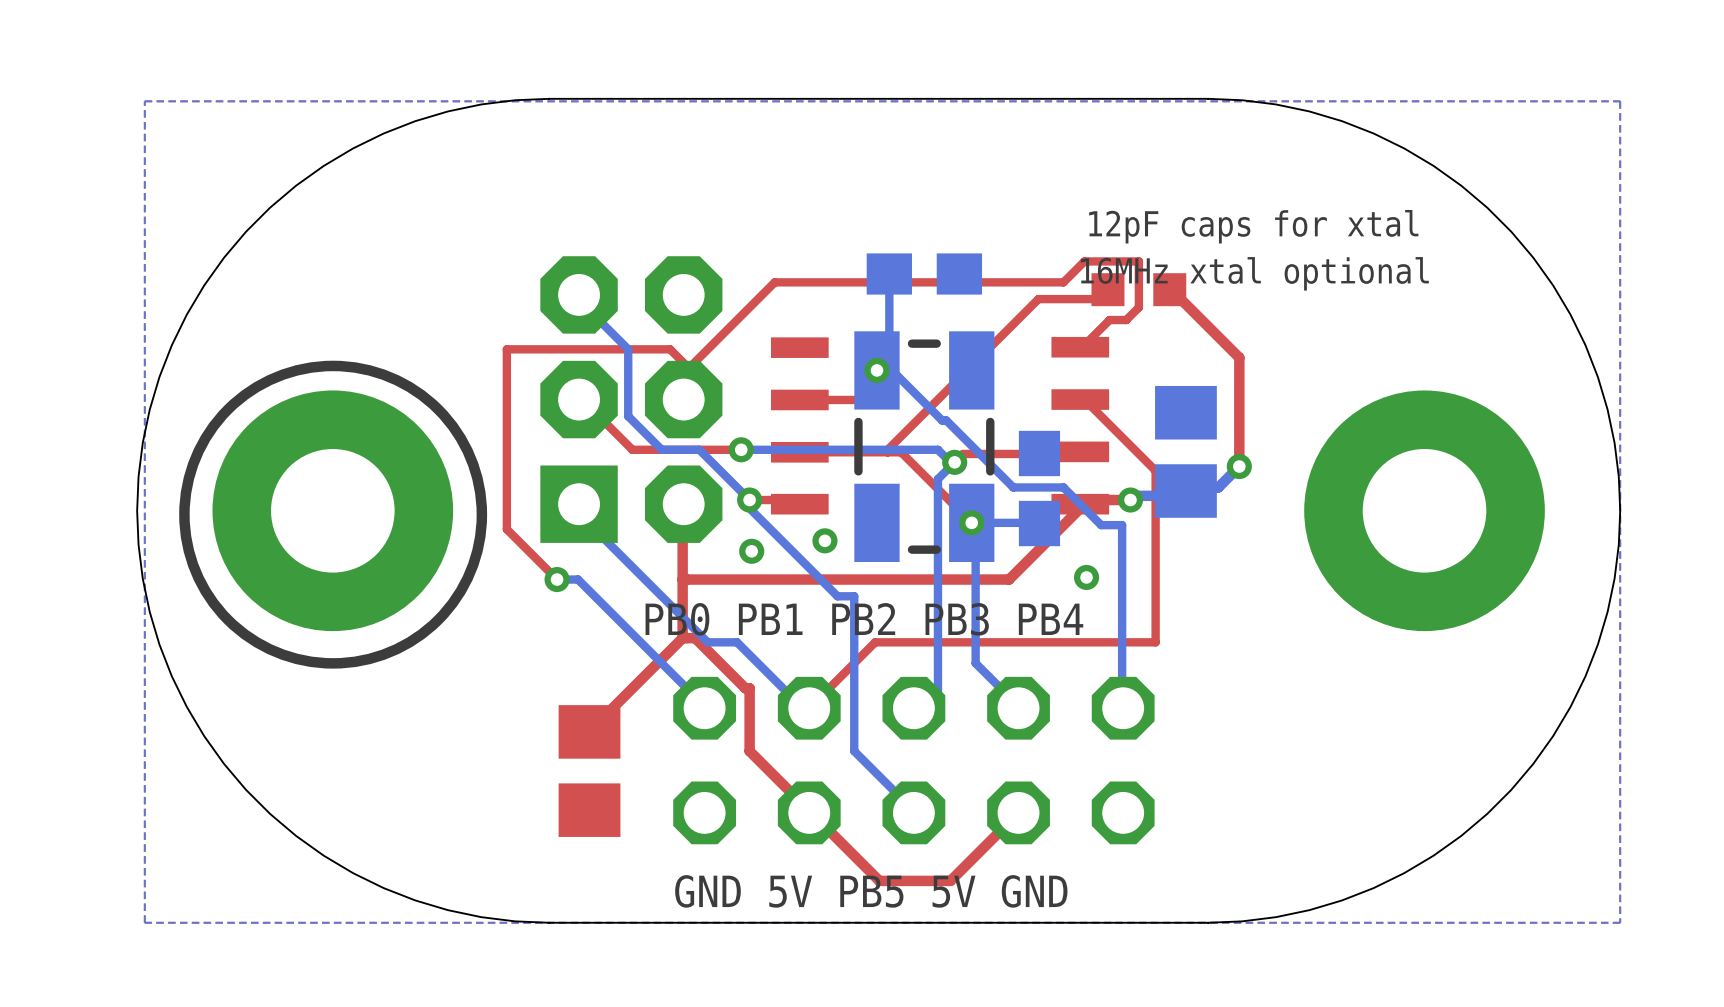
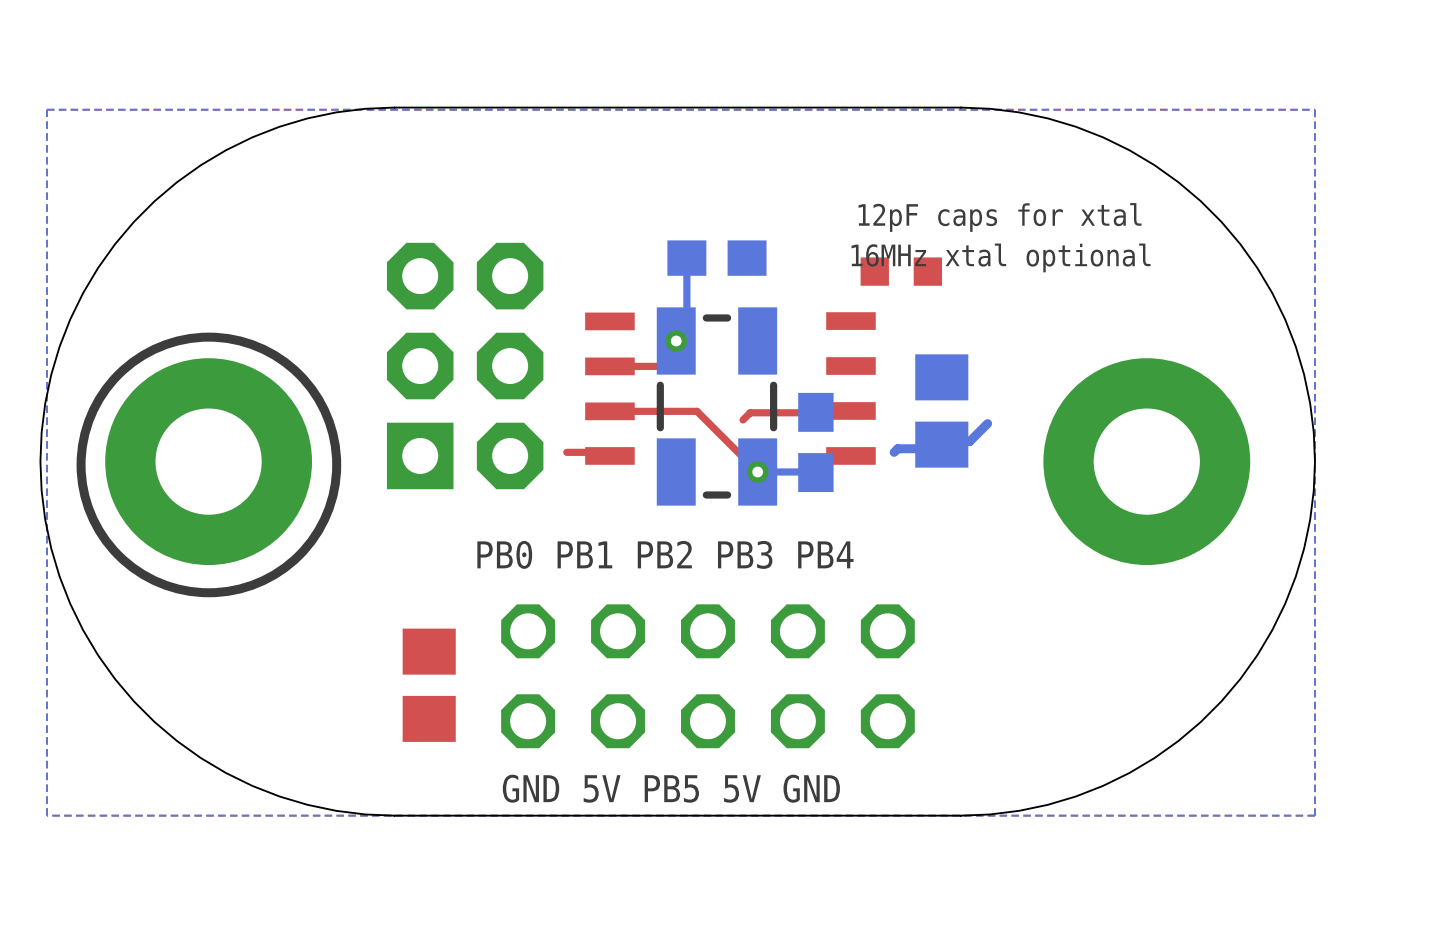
top track: (1107, 289) (1097, 299) (1038, 299) (887, 449) (887, 452) -> none
top track: (1169, 289) (1239, 357) (1239, 466) -> none
bottom track: (579, 294) (582, 294) (582, 303) (628, 349) (628, 416) (661, 449) (699, 449) (749, 500) (749, 508) (837, 596) (854, 596) (854, 751) (913, 812) -> none
top track: (1080, 347) (1109, 320) (1126, 320) (1138, 307) (1138, 261) (1084, 261) (1063, 282) (774, 282) (686, 370) (686, 399) (683, 399) (686, 366) (670, 349) (506, 349) (506, 529) (557, 579) -> none
bottom track: (876, 370) (887, 374) (896, 374) (942, 420) (946, 420) (1013, 487) (1063, 487) (1101, 525) (1122, 525) (1123, 708) -> none
top track: (579, 399) (582, 399) (632, 449) (741, 449) -> none
top track: (1080, 399) (1084, 399) (1155, 470) (1155, 642) (875, 642) (809, 708) -> none
bottom track: (741, 449) (937, 449) (950, 462) (954, 462) (937, 479) (937, 705) (917, 705) (913, 708) -> none
via: (741, 449) -> none
via: (954, 462) -> none
via: (1239, 466) -> none
via: (749, 500) -> none
top track: (1130, 500) (1088, 500) (1084, 504) (1080, 504) (1080, 508) (1009, 579) (682, 579) -> none
via: (1130, 500) -> none
bottom track: (579, 504) (582, 504) (582, 537) (603, 537) (707, 642) (737, 642) (799, 705) (808, 705) (809, 708) -> none
top track: (683, 504) (682, 638) -> none
bottom track: (971, 522) (975, 525) (975, 663) (1018, 708) -> none
via: (824, 540) -> none
via: (751, 551) -> none
via: (1086, 577) -> none
bottom track: (557, 579) (578, 579) (704, 708) -> none
via: (557, 579) -> none
top track: (682, 638) (589, 731) -> none
top track: (682, 638) (695, 638) (745, 688) (749, 688) (749, 751) (879, 880) (950, 880) (1018, 812) -> none

